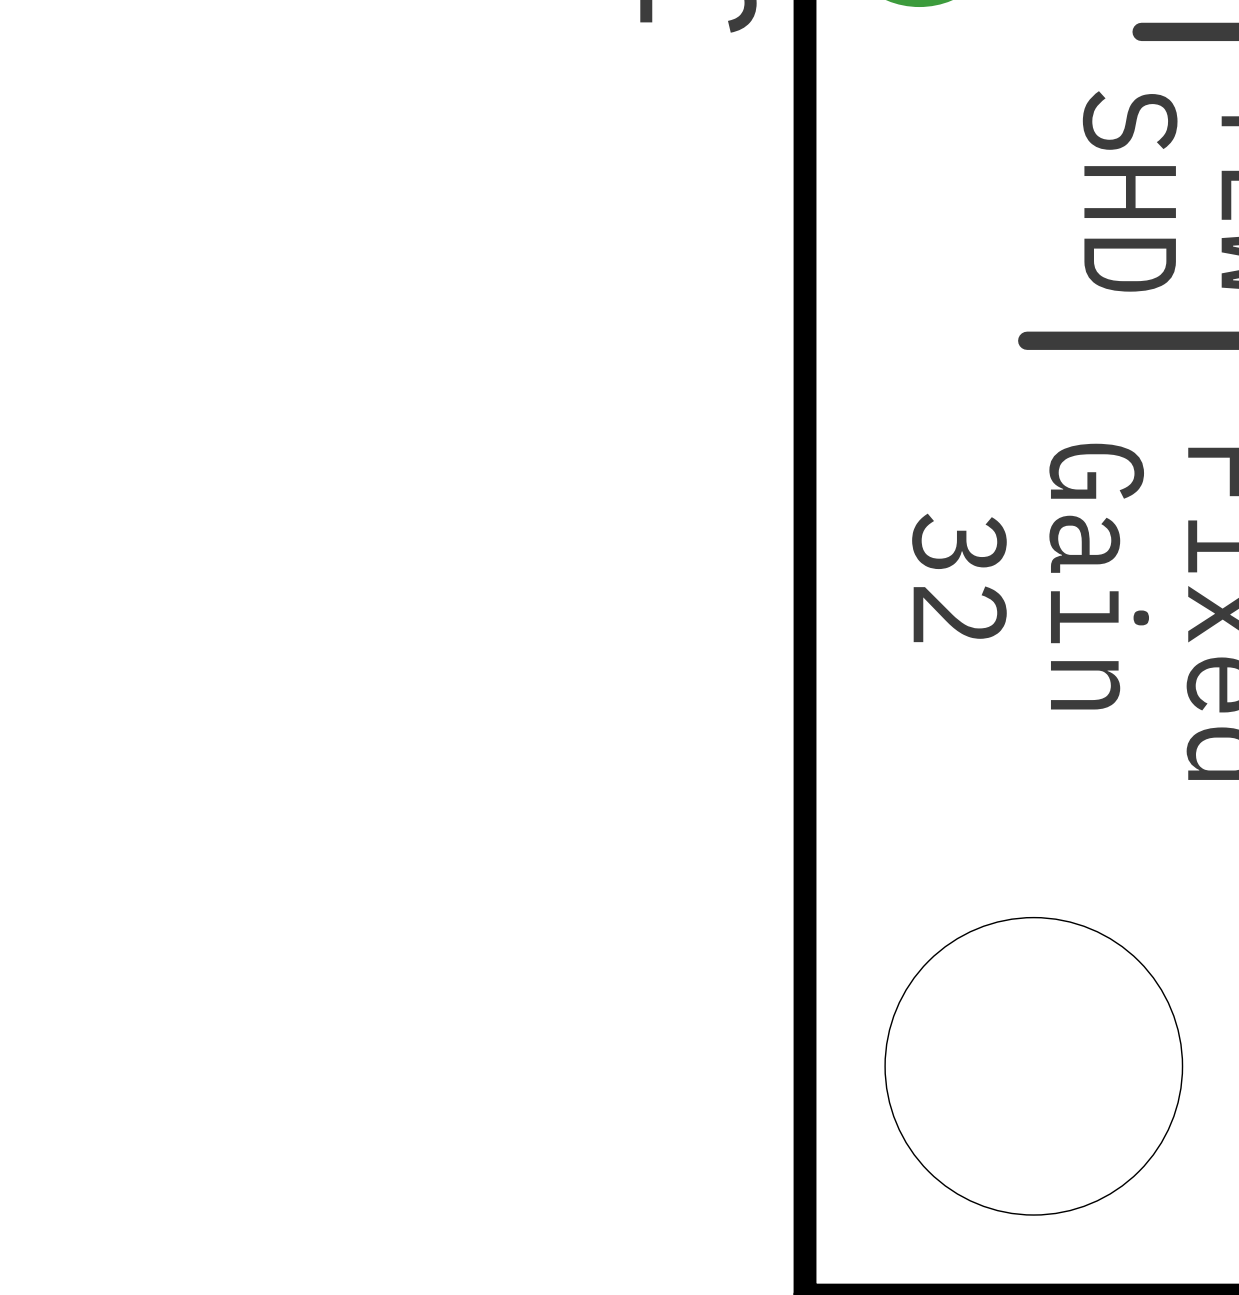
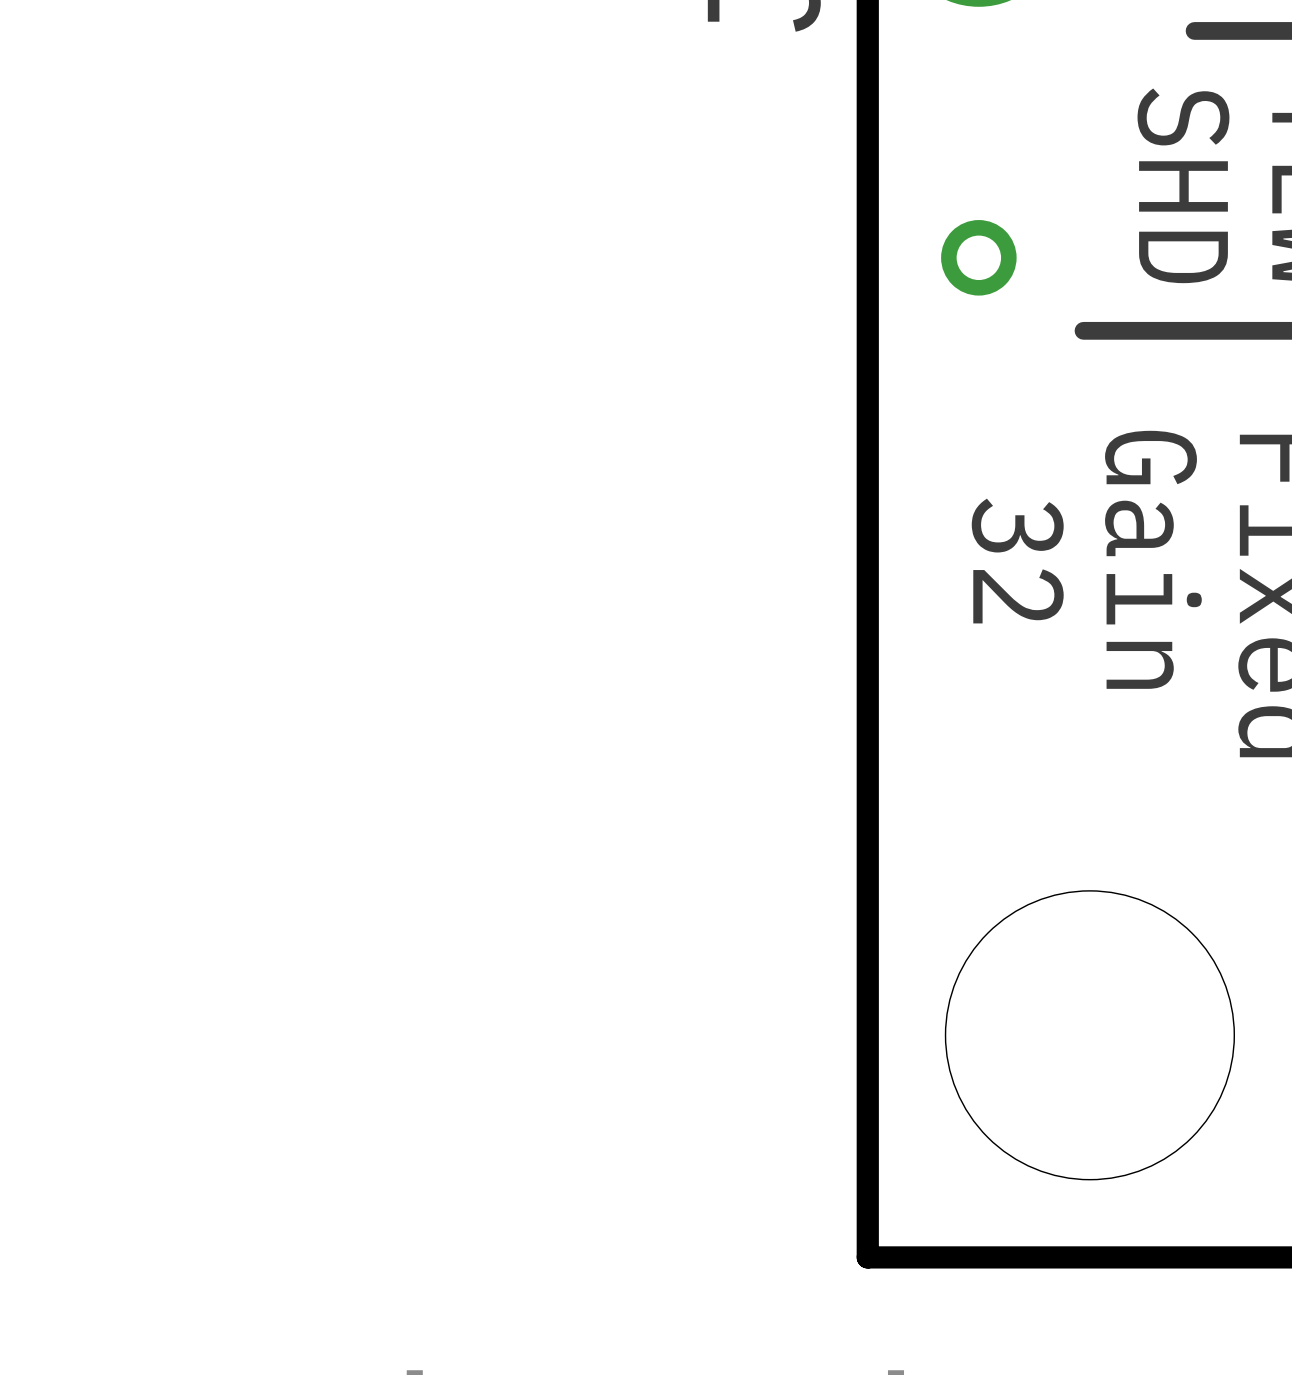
via: none -> (978, 257)

